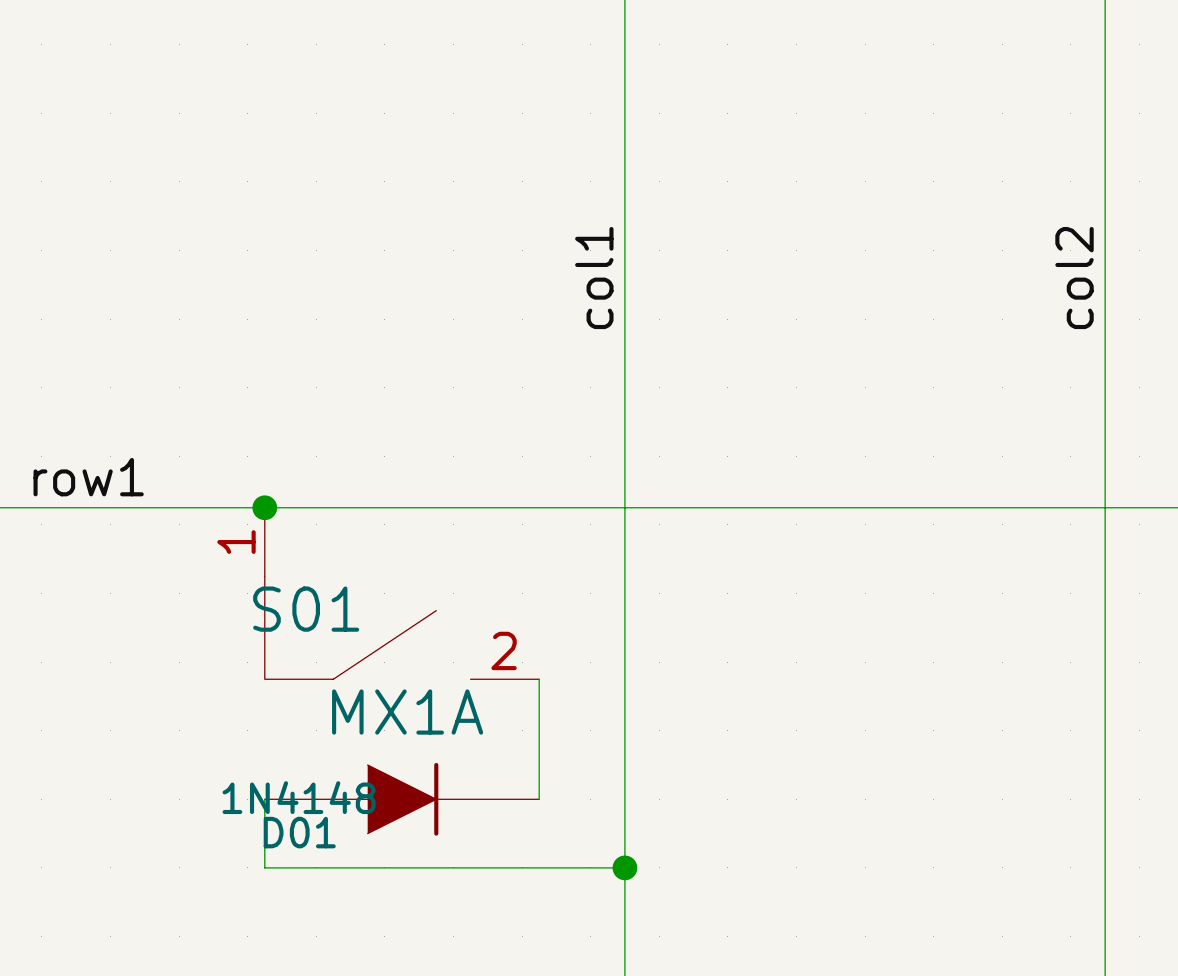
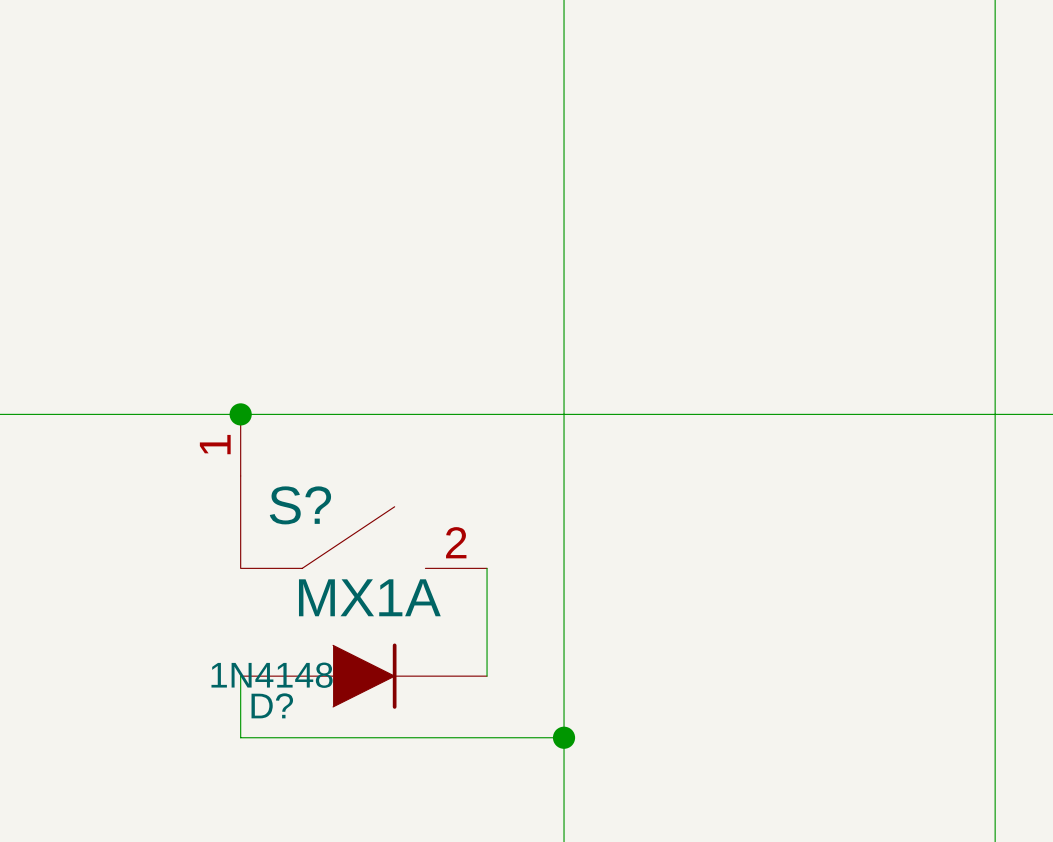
label: col1 (594, 278) -> none
label: col2 (1074, 278) -> none
label: row1 (88, 477) -> none
S01 name: S01 (306, 609) -> S? (300, 505)
D01 name: D01 (299, 832) -> D? (272, 705)

